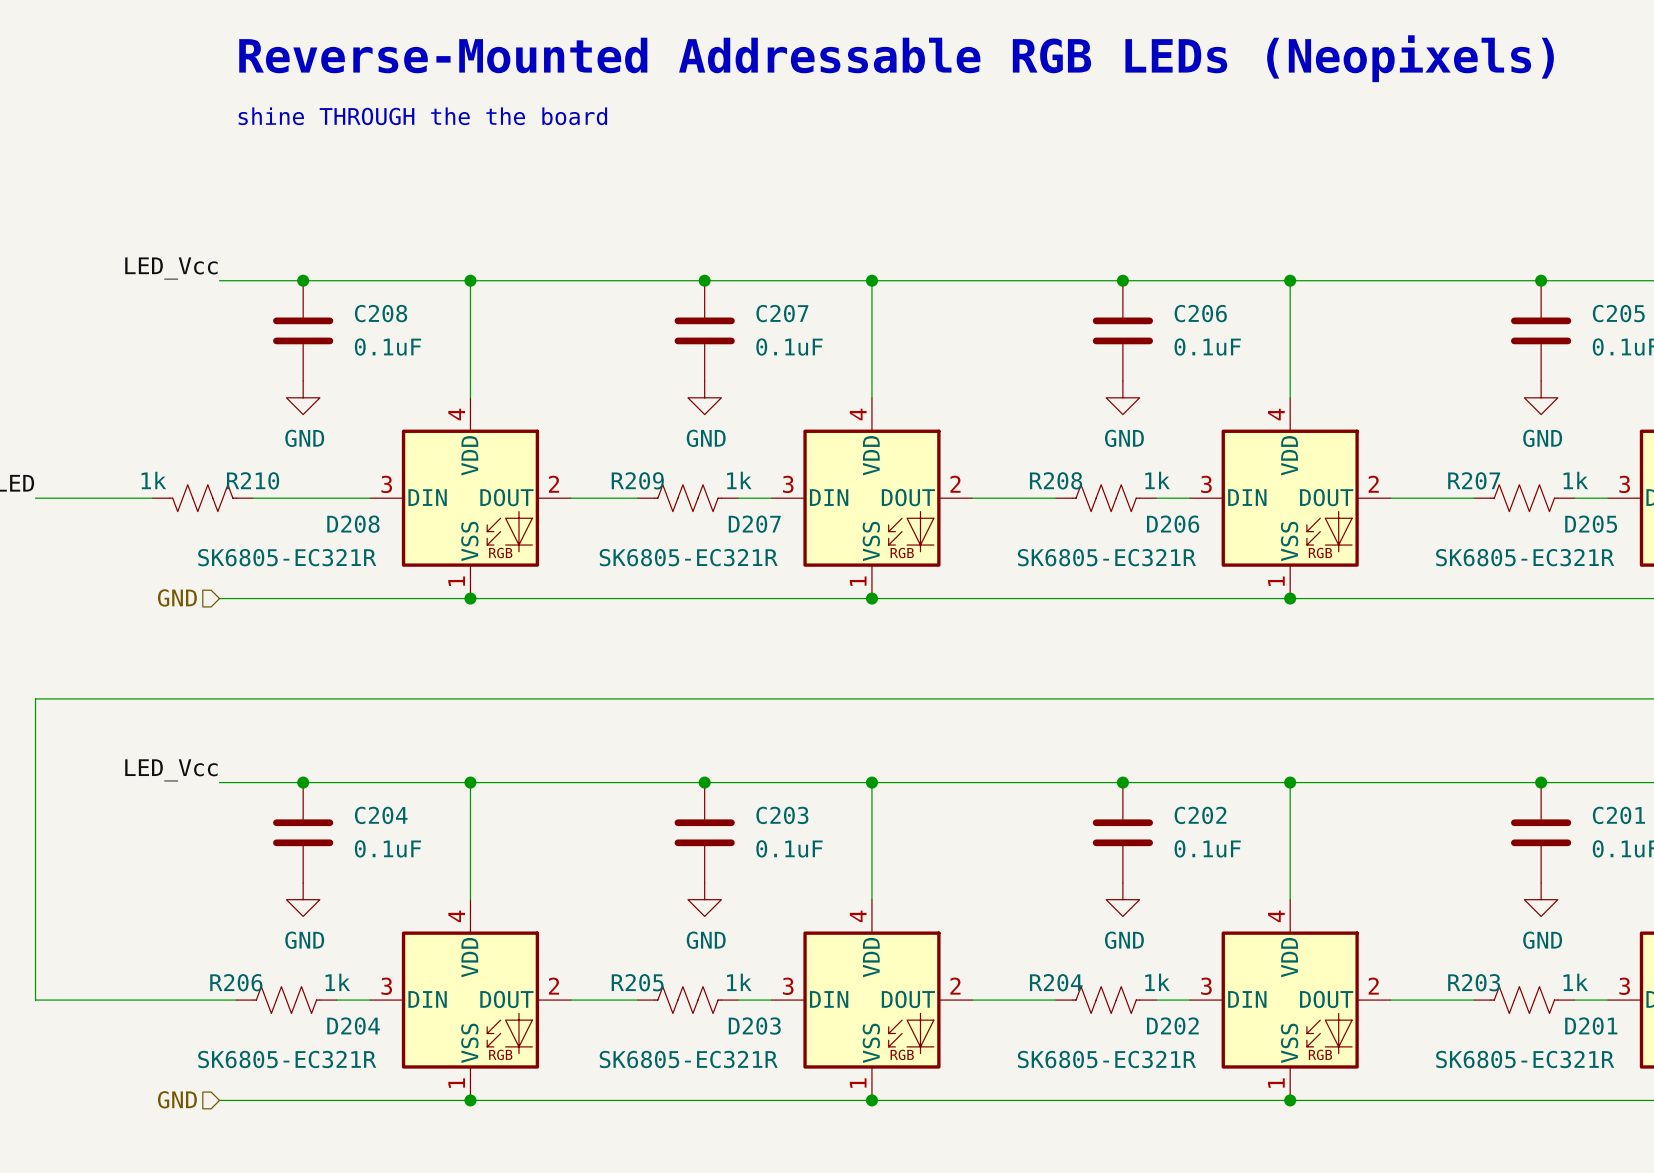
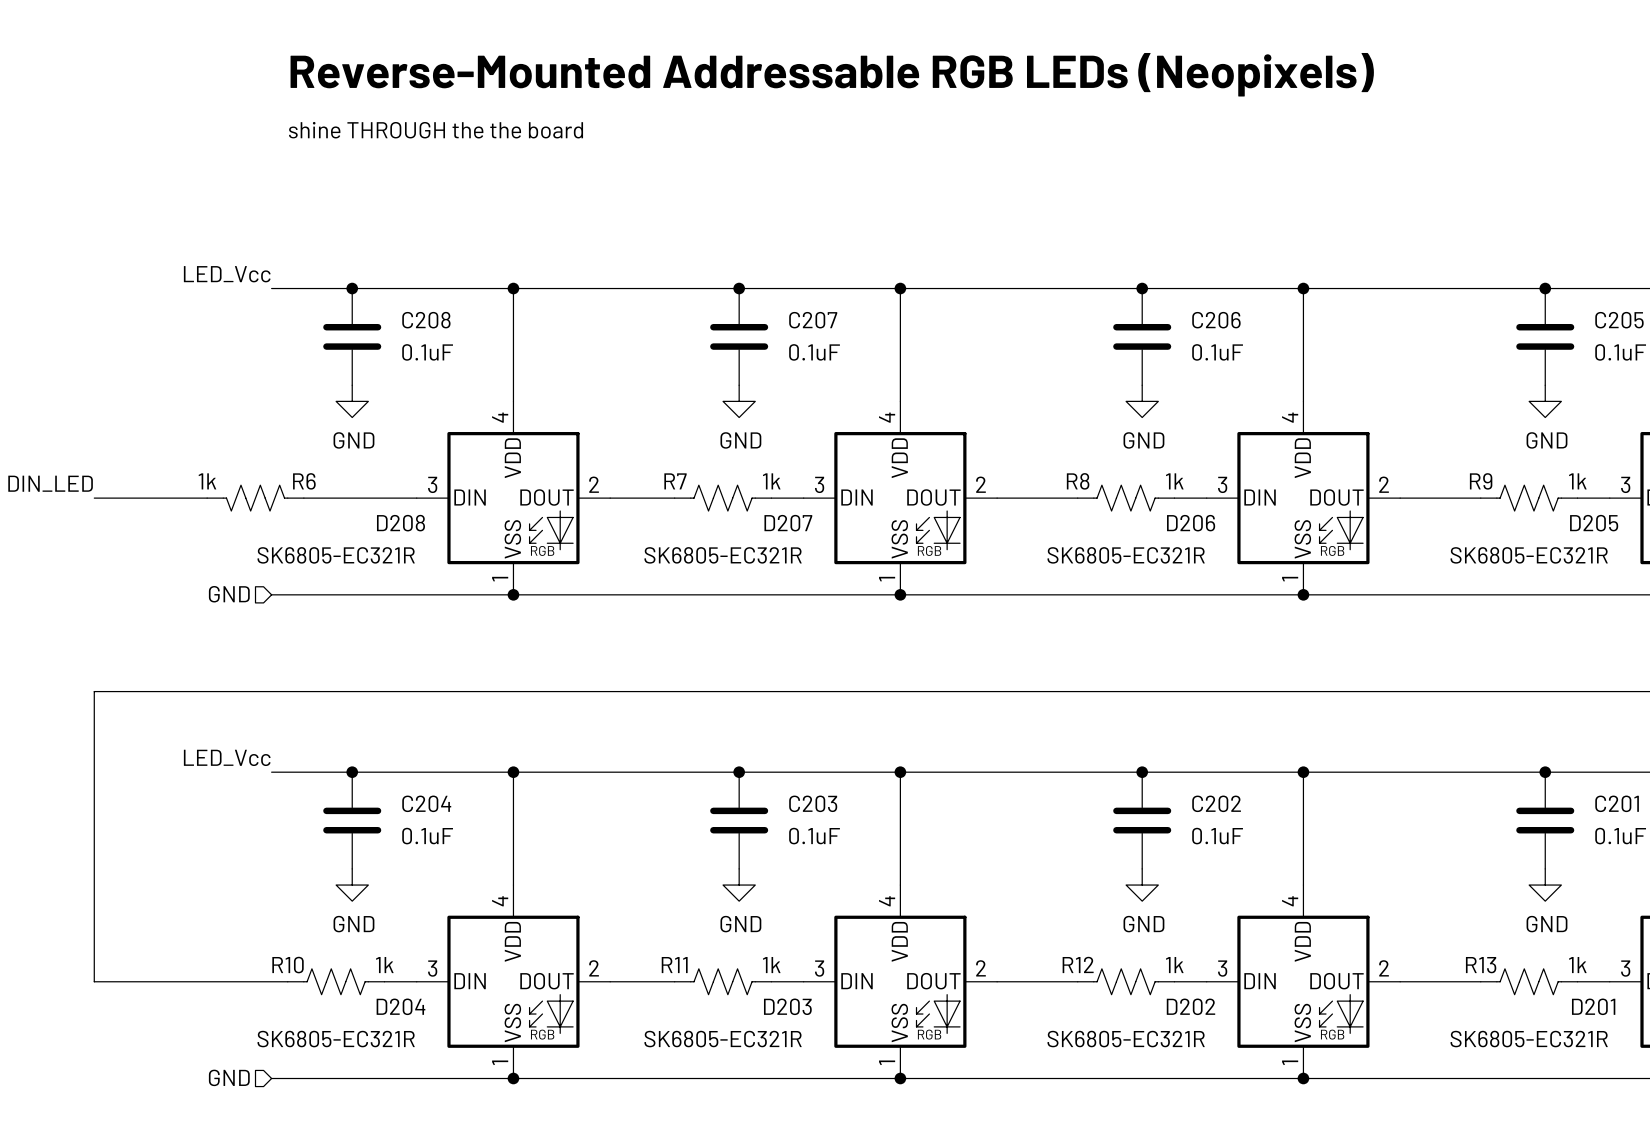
R210 name: R210 (253, 480) -> R6 (304, 481)
R209 name: R209 (637, 480) -> R7 (675, 481)
R208 name: R208 (1056, 480) -> R8 (1078, 481)
R207 name: R207 (1474, 480) -> R9 (1481, 481)
R206 name: R206 (236, 982) -> R10 (288, 965)
R205 name: R205 (637, 982) -> R11 (674, 965)
R204 name: R204 (1056, 982) -> R12 (1078, 964)
R203 name: R203 (1474, 982) -> R13 (1481, 965)

